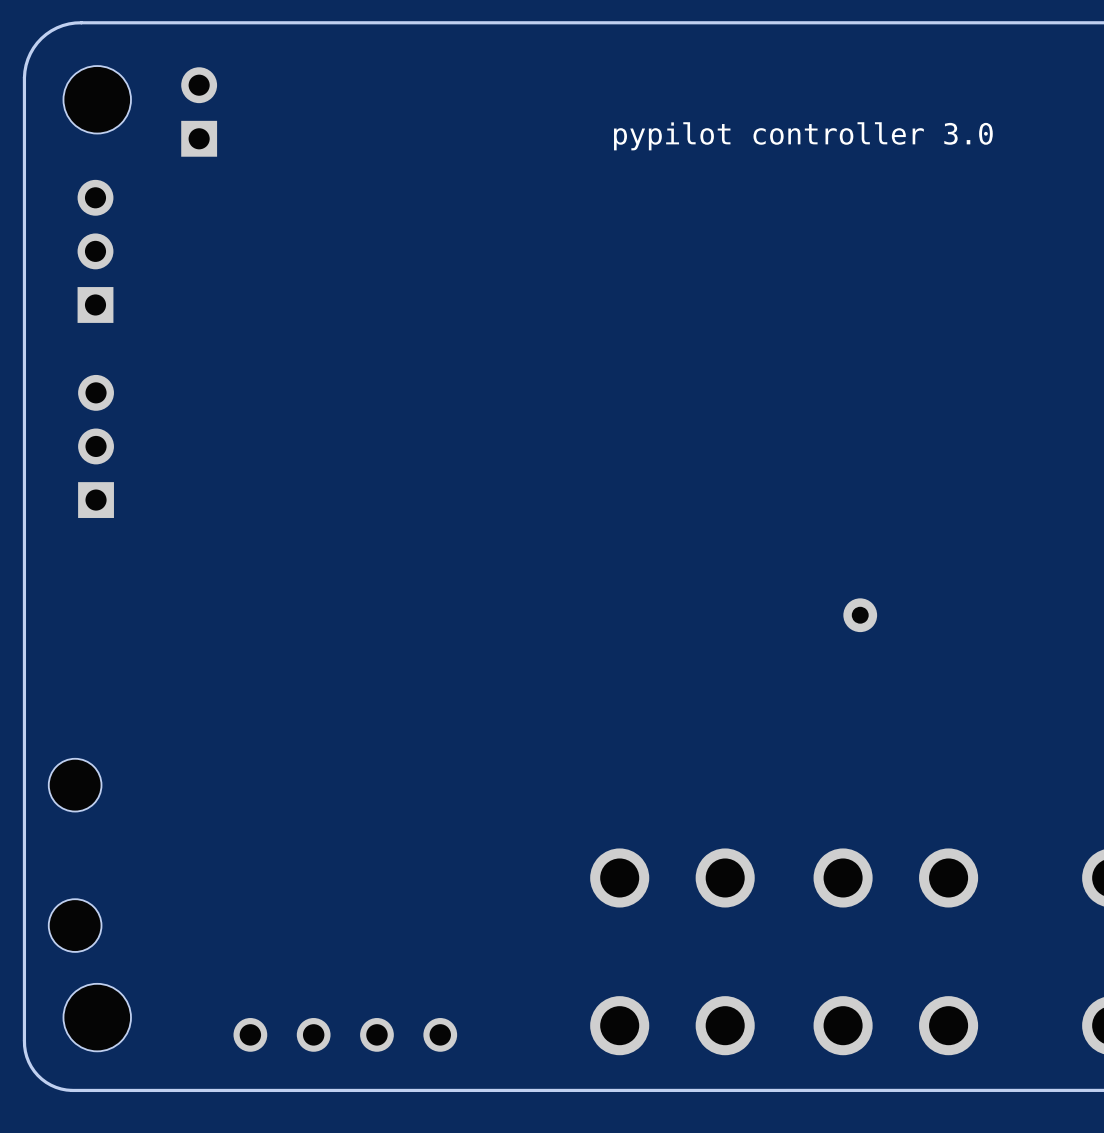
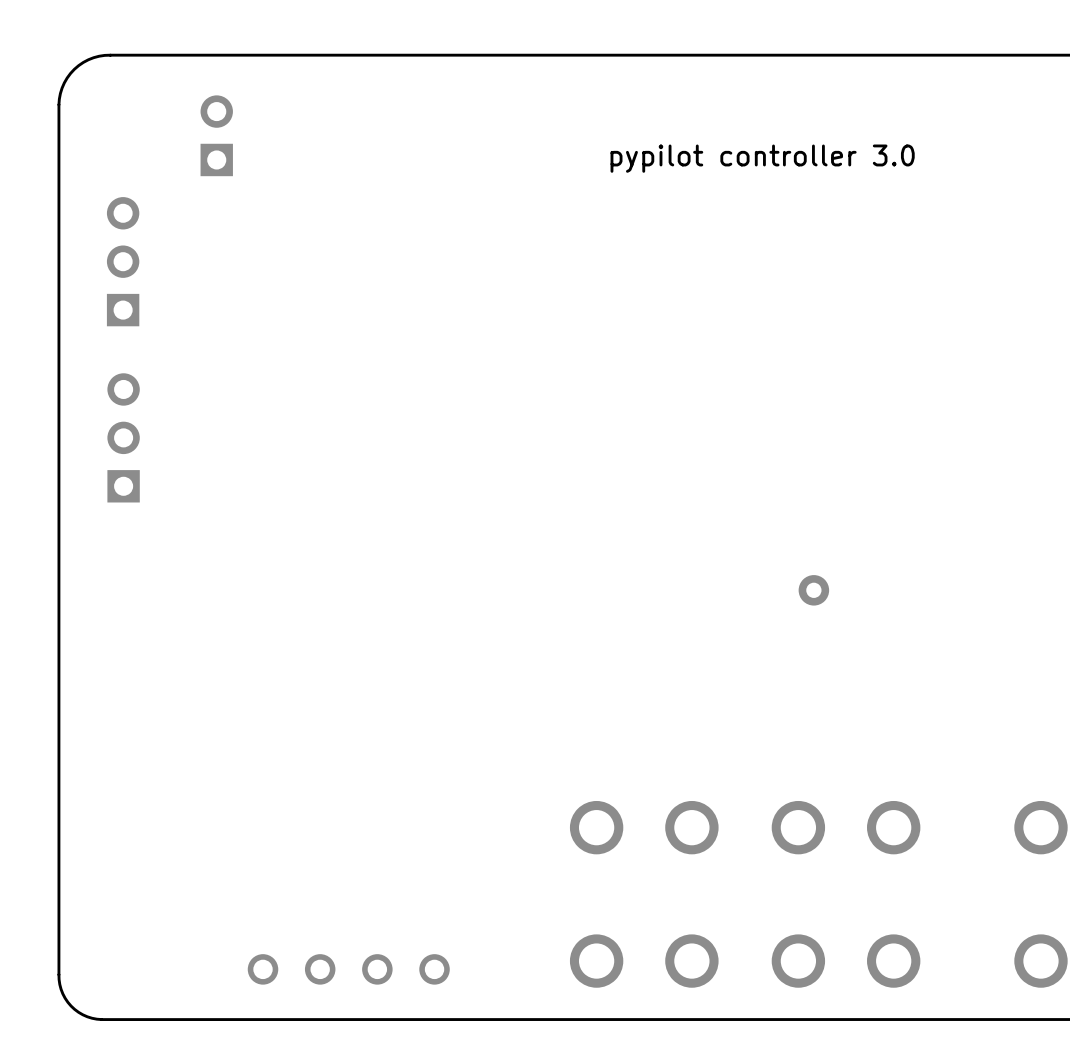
part: (97, 99) -> none
part: (75, 785) -> none
part: (75, 925) -> none
part: (97, 1017) -> none

